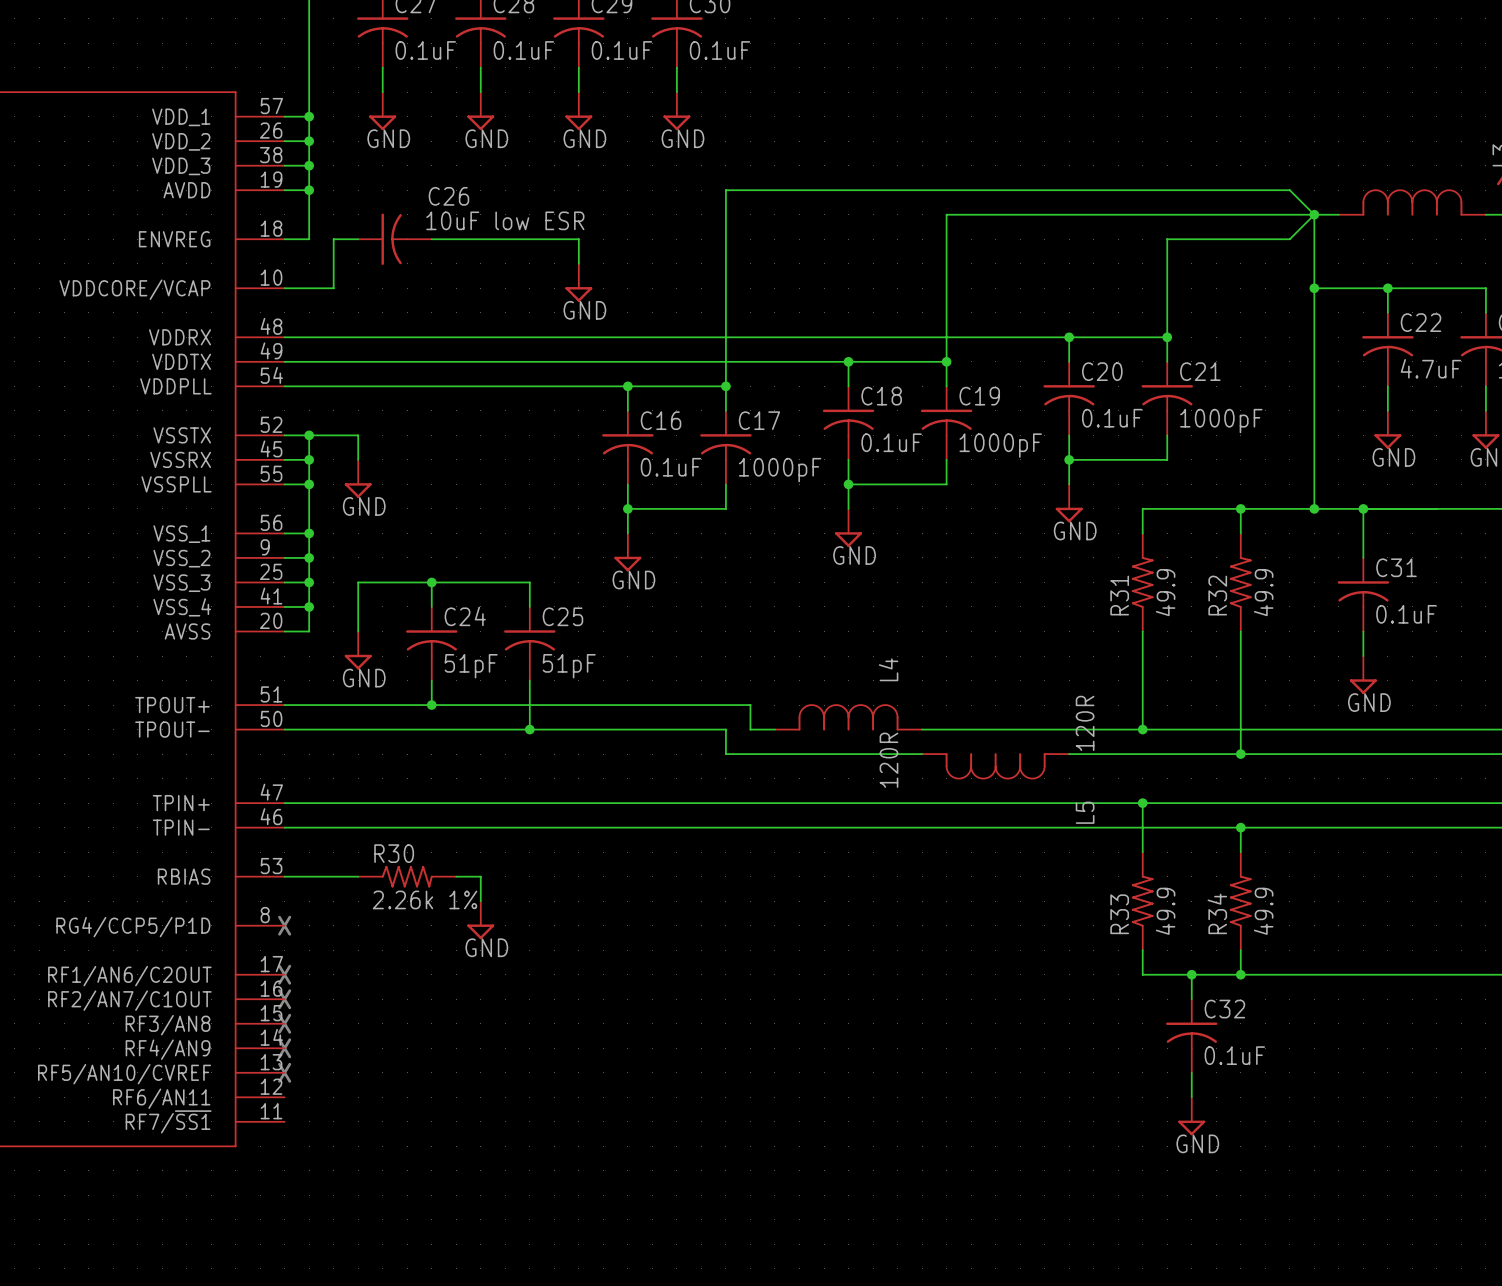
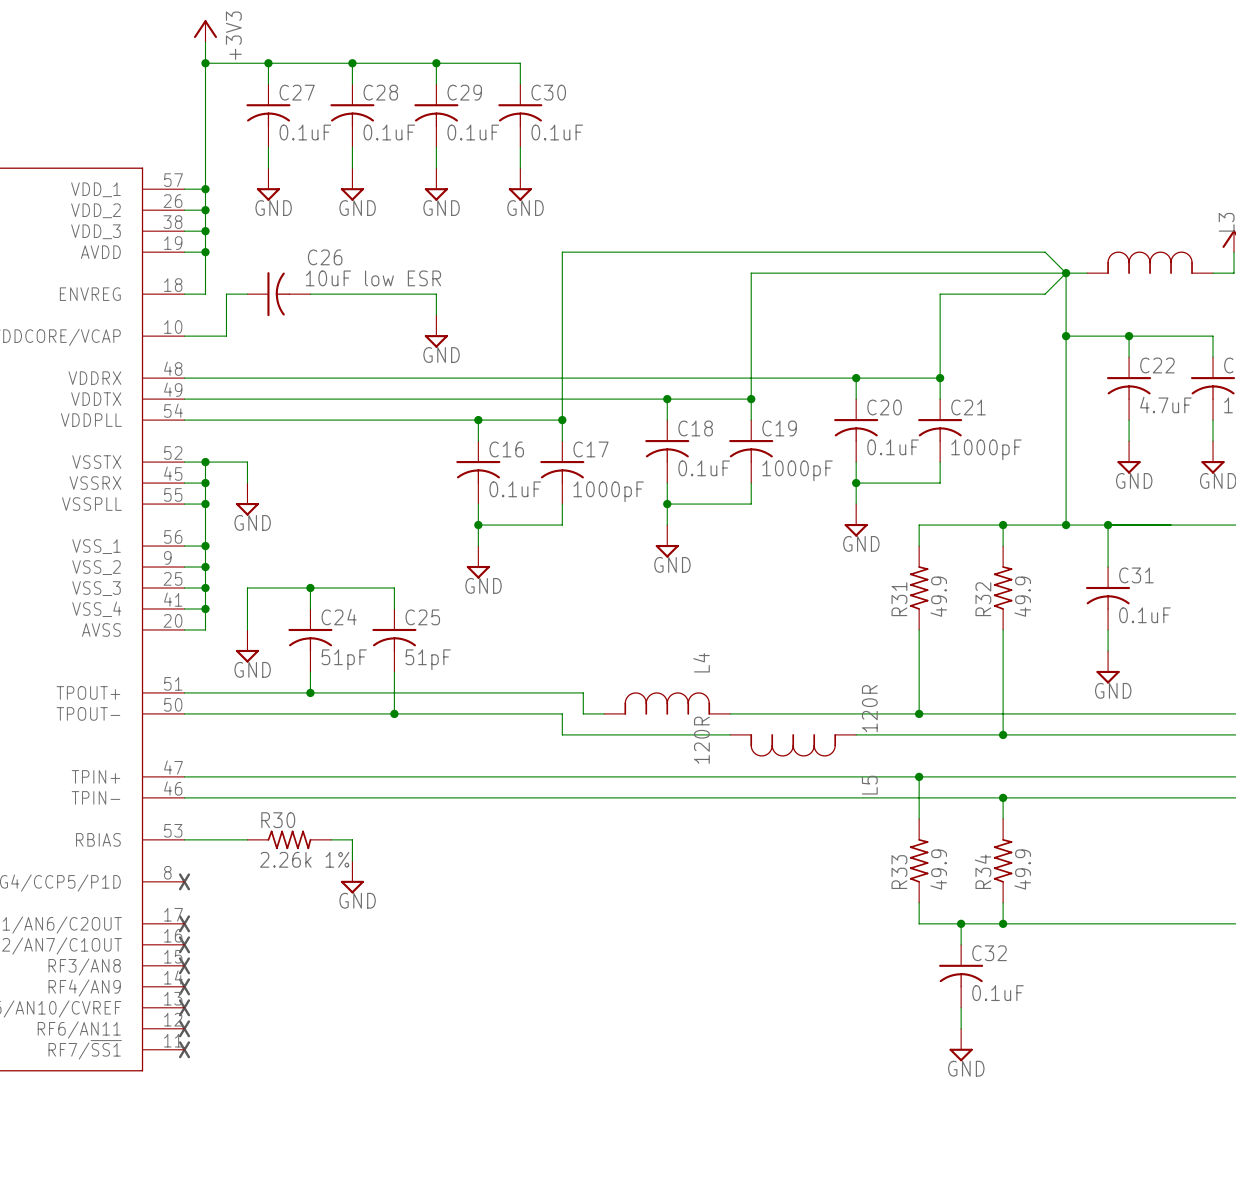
text: none -> X (184, 1028)
text: none -> X (184, 1049)

